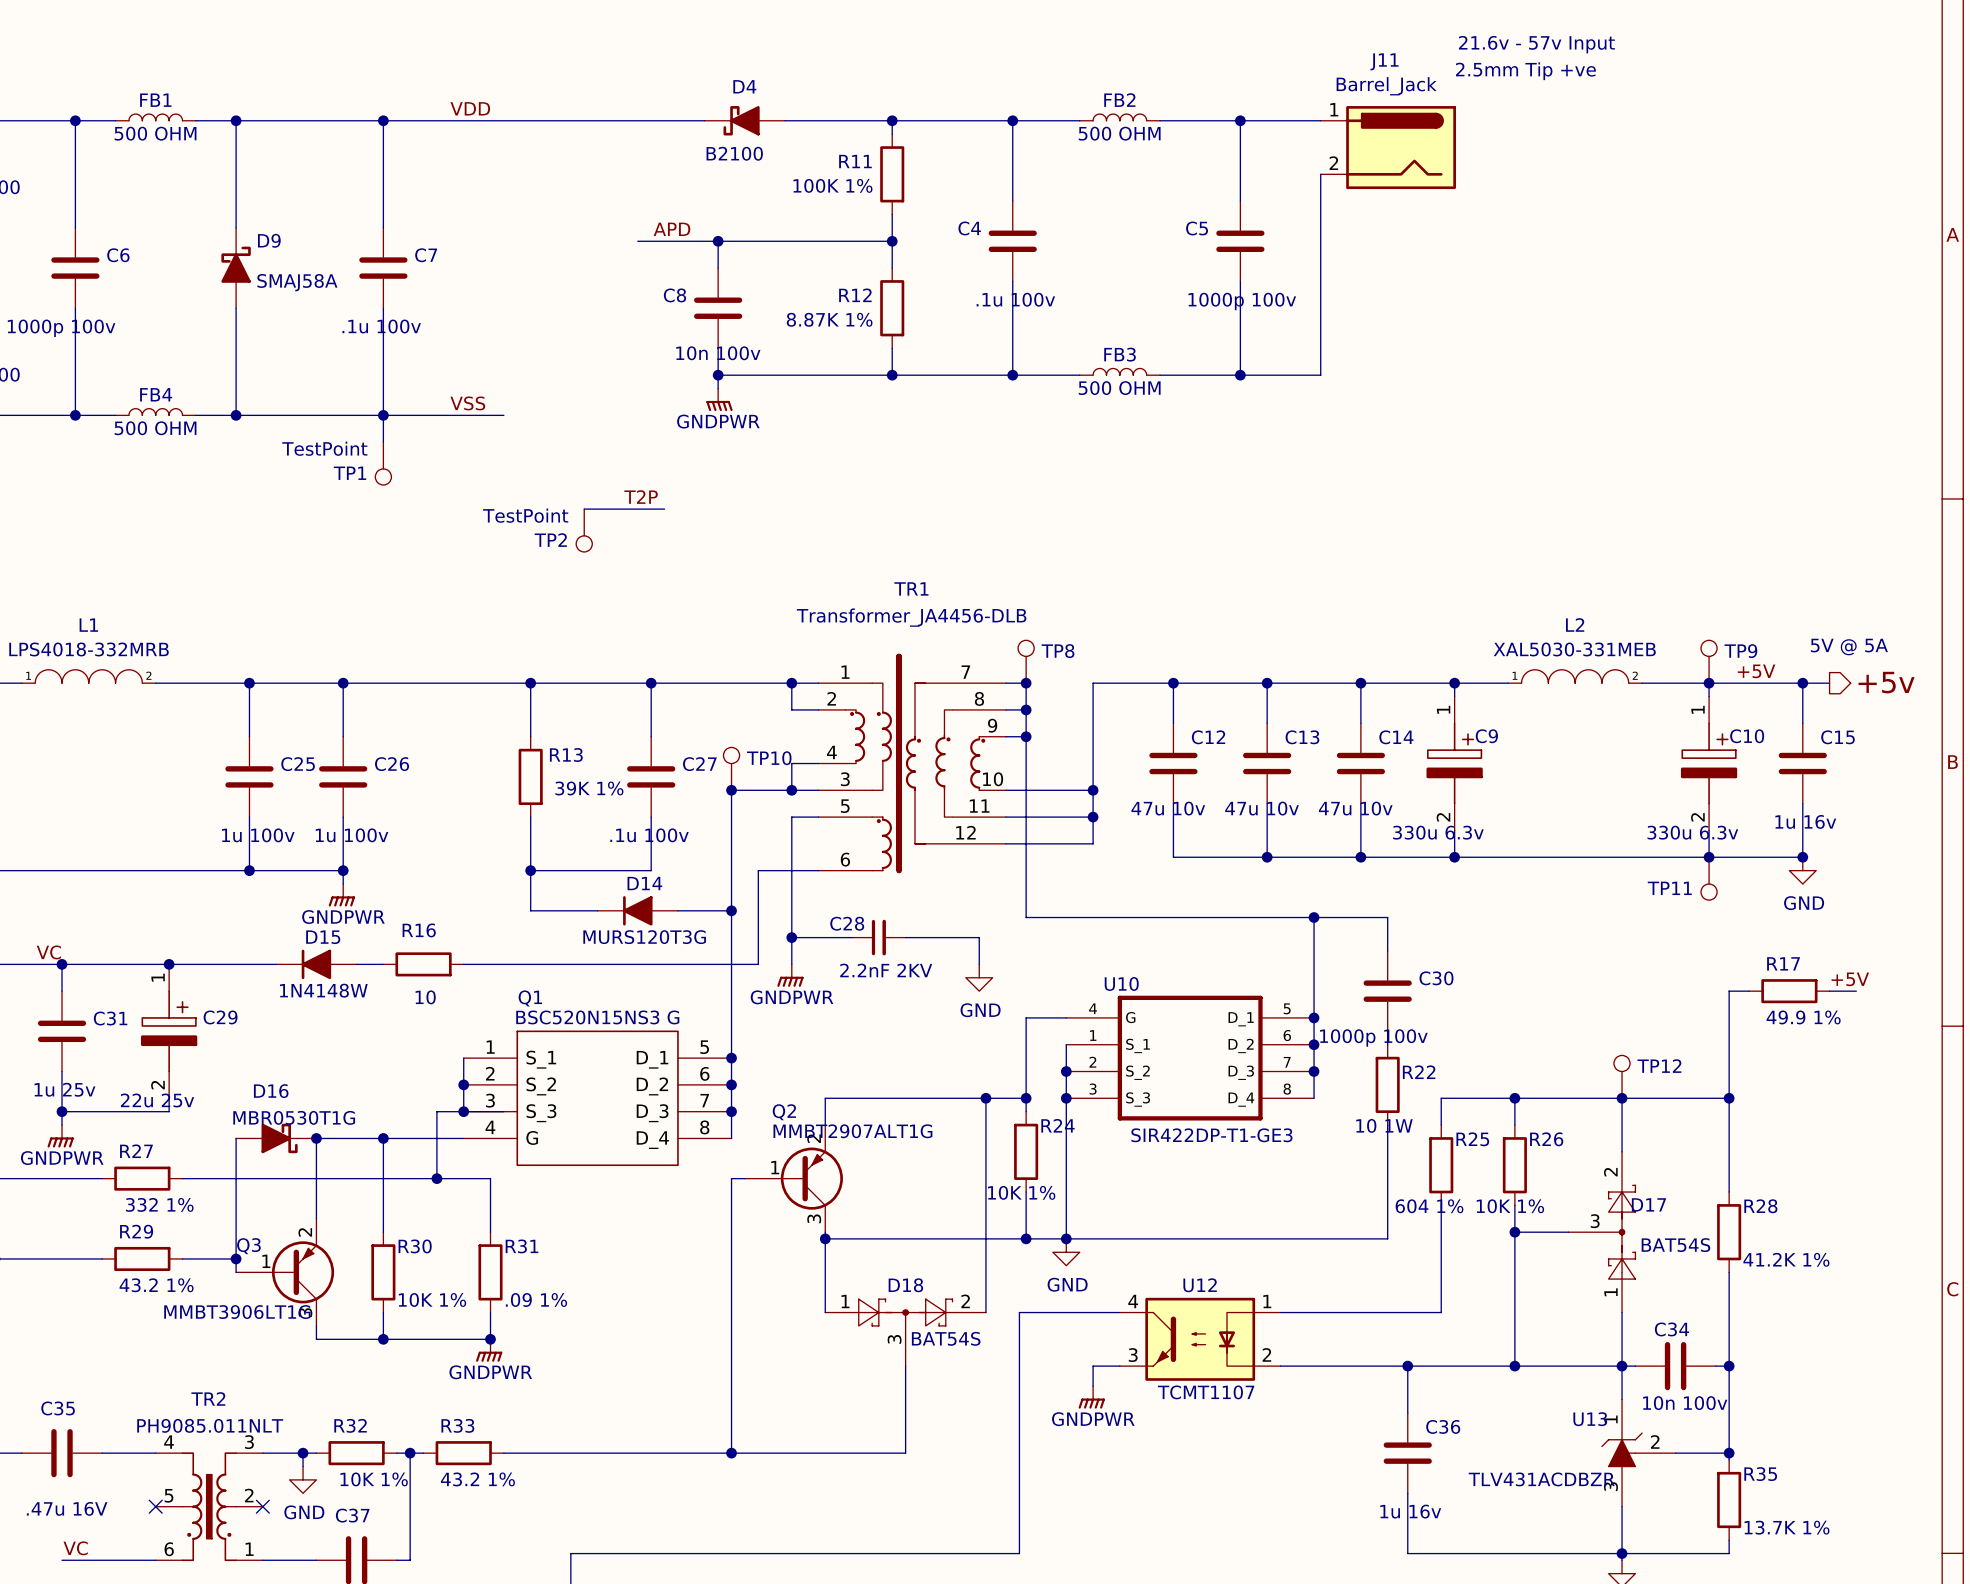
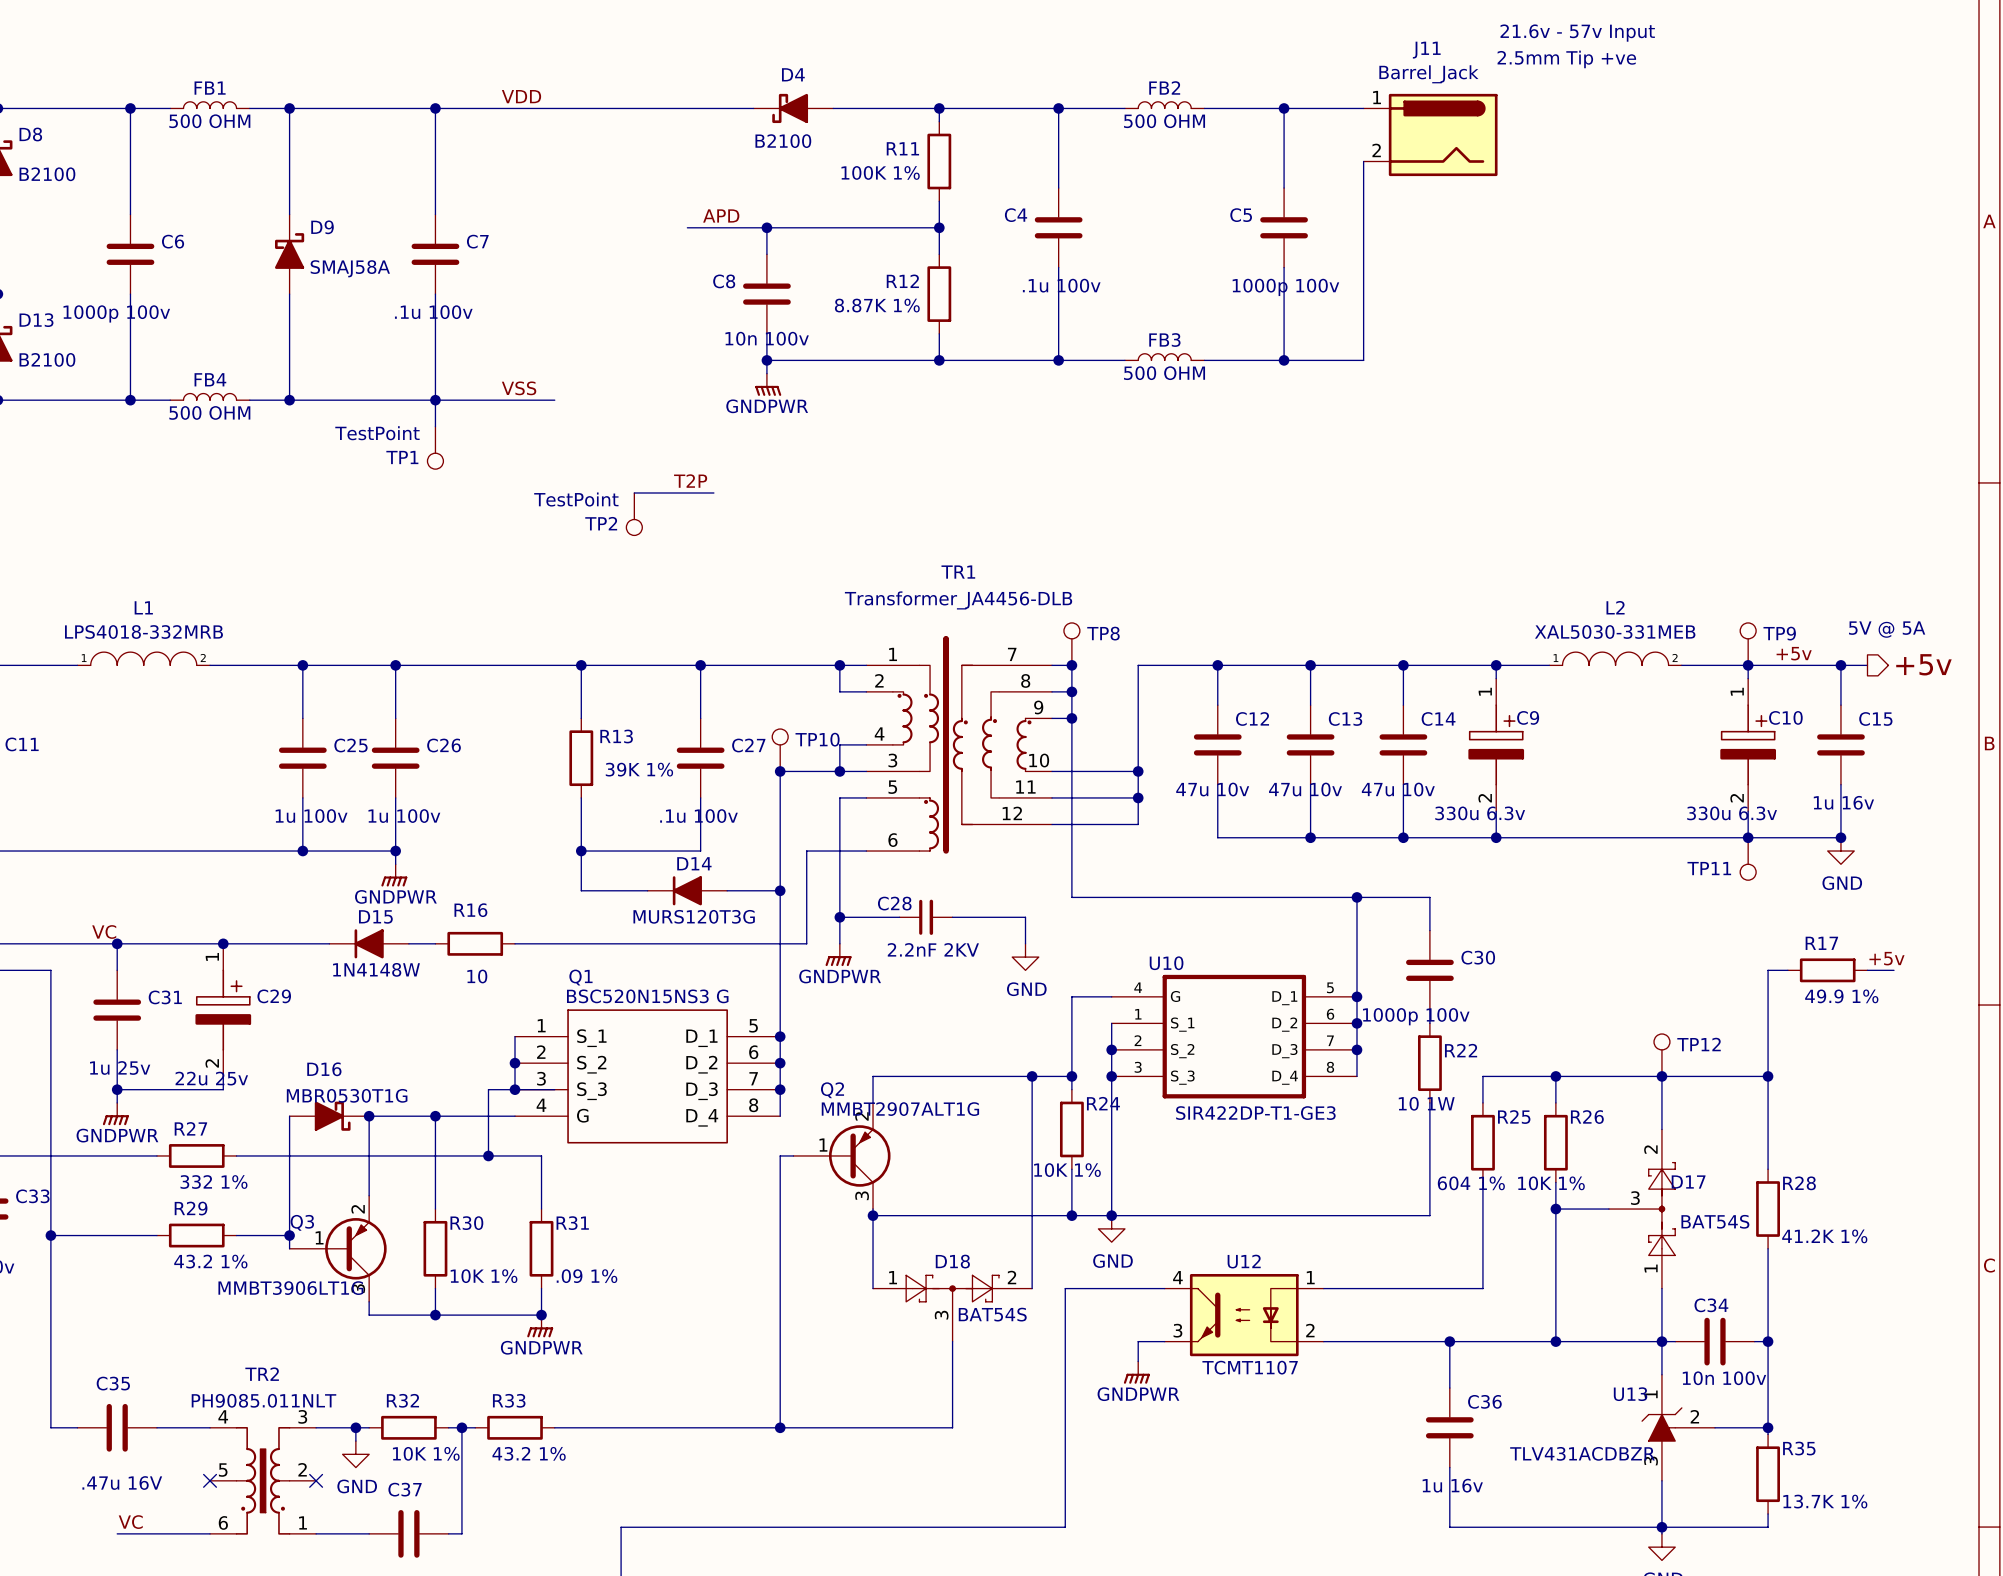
label: +5V (1756, 671) -> +5v (1794, 653)
label: +5V (1850, 979) -> +5v (1886, 958)

